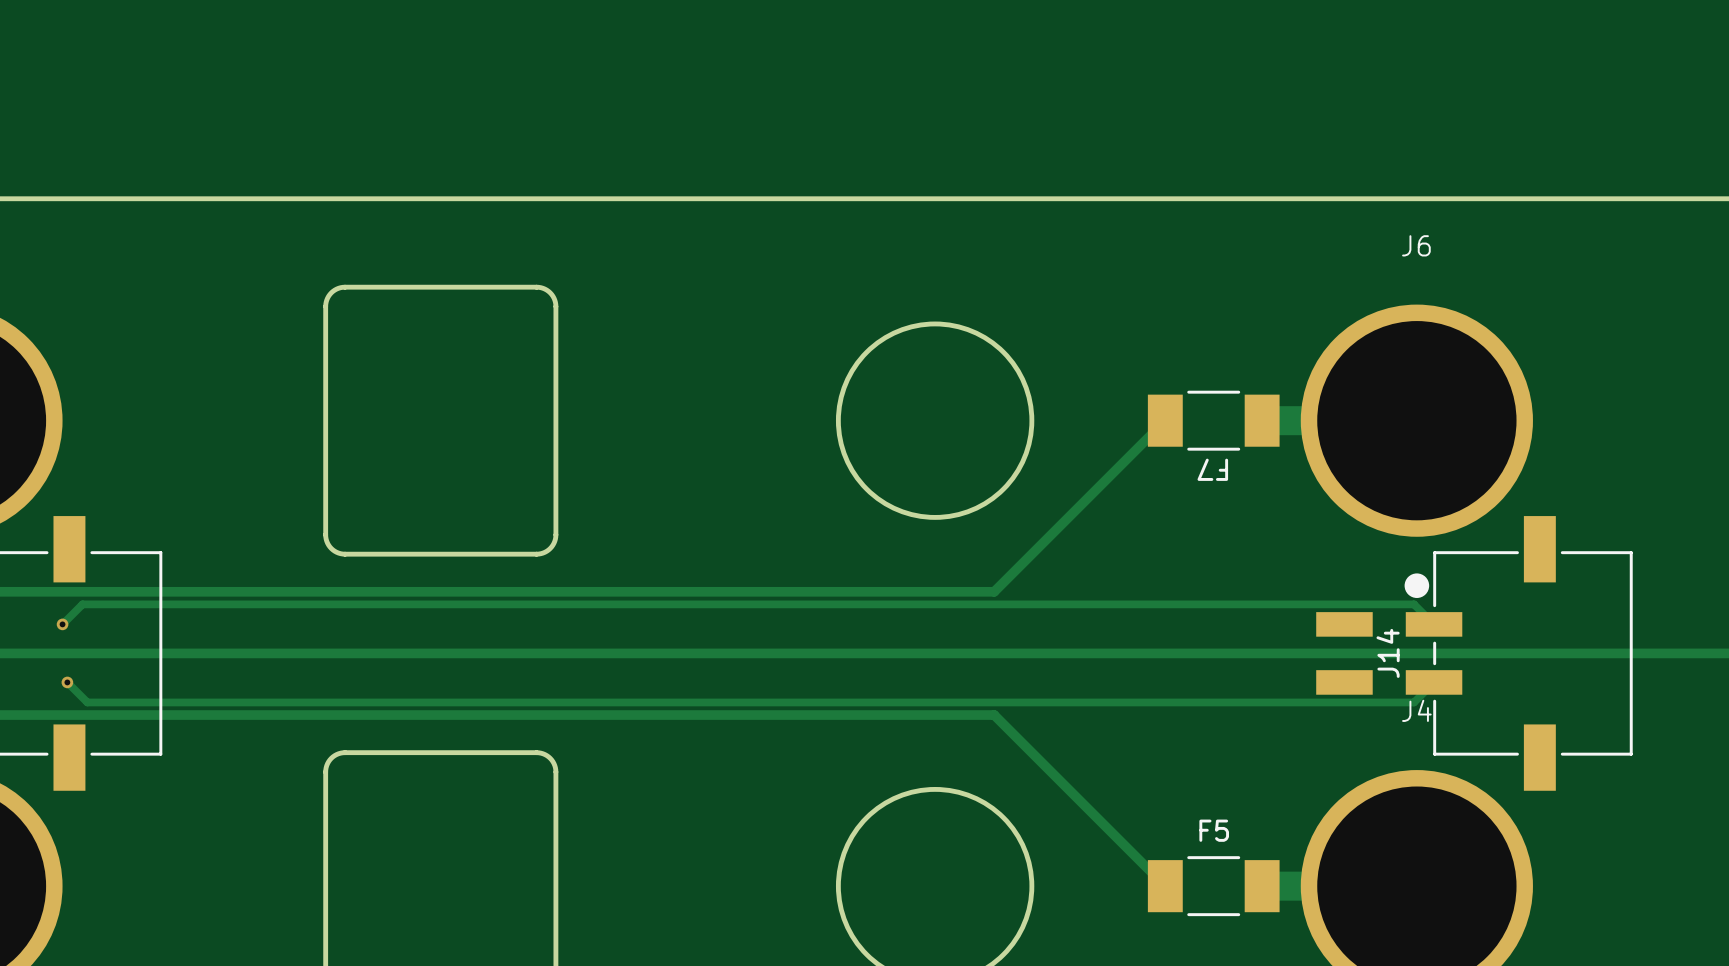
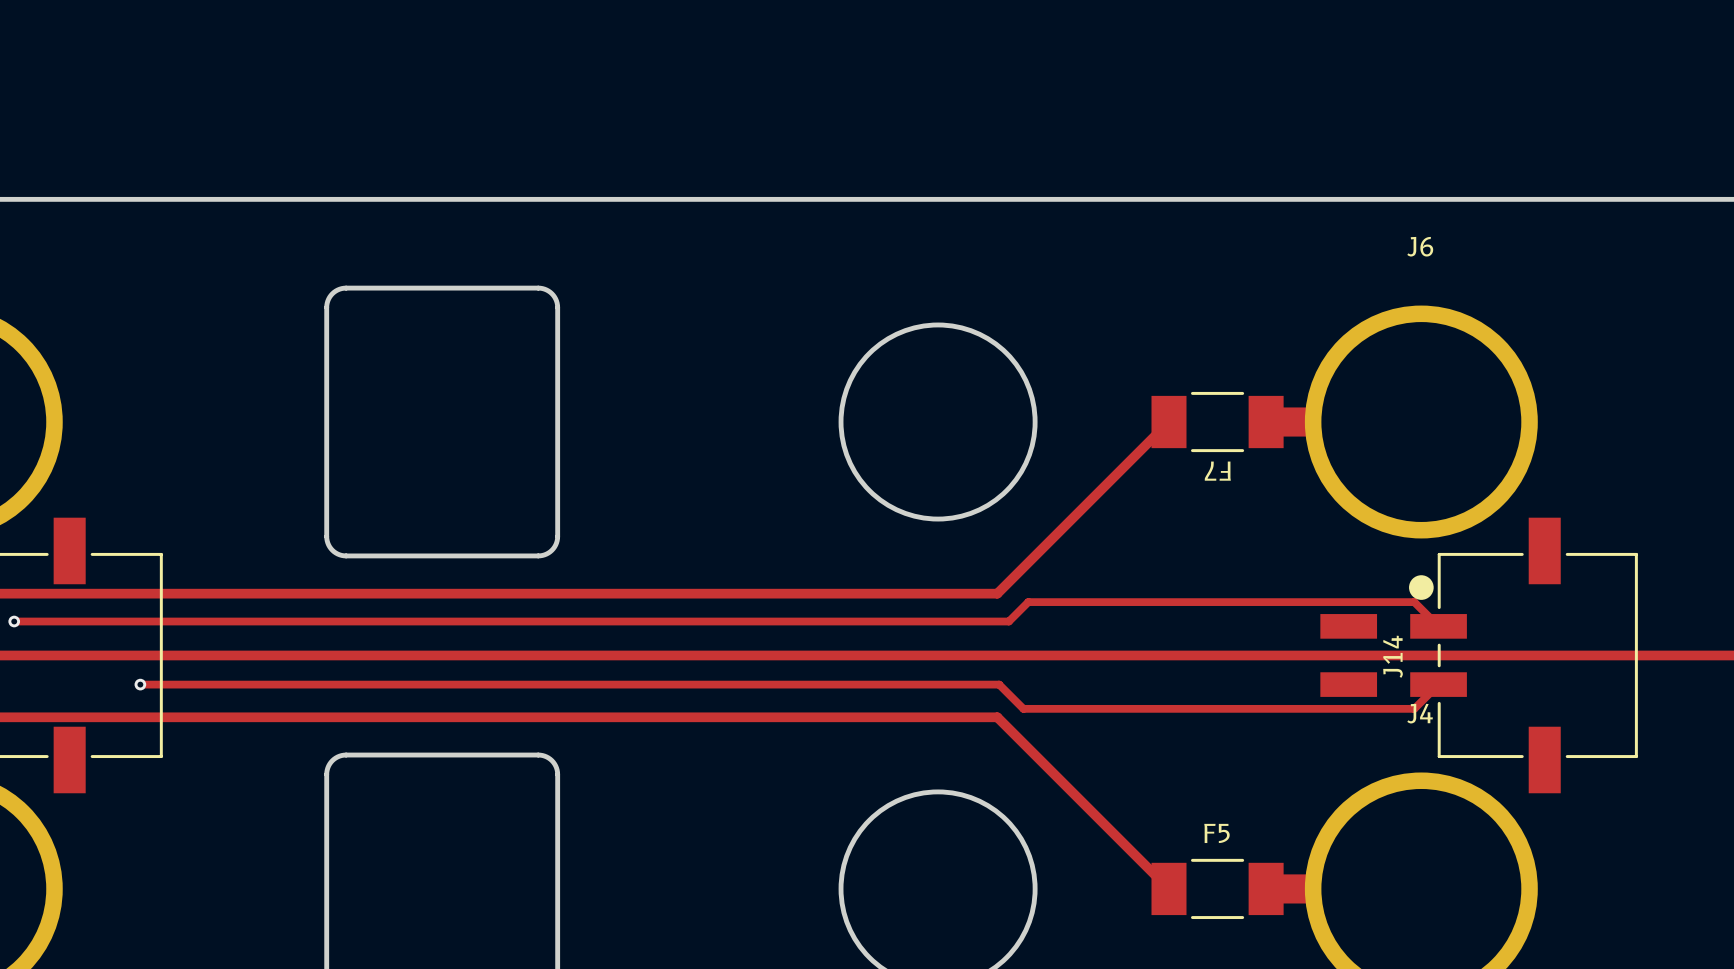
track: (1414, 604) (82, 604) (62, 624) -> (1418, 606) (1414, 602) (1028, 602) (1008, 621) (14, 621)
via: none -> (14, 621)
via: (62, 624) -> none
track: (67, 682) (87, 702) (1414, 702) -> (140, 684) (999, 684) (1023, 708) (1414, 708) (1418, 704)
via: (67, 682) -> none
via: none -> (140, 684)

